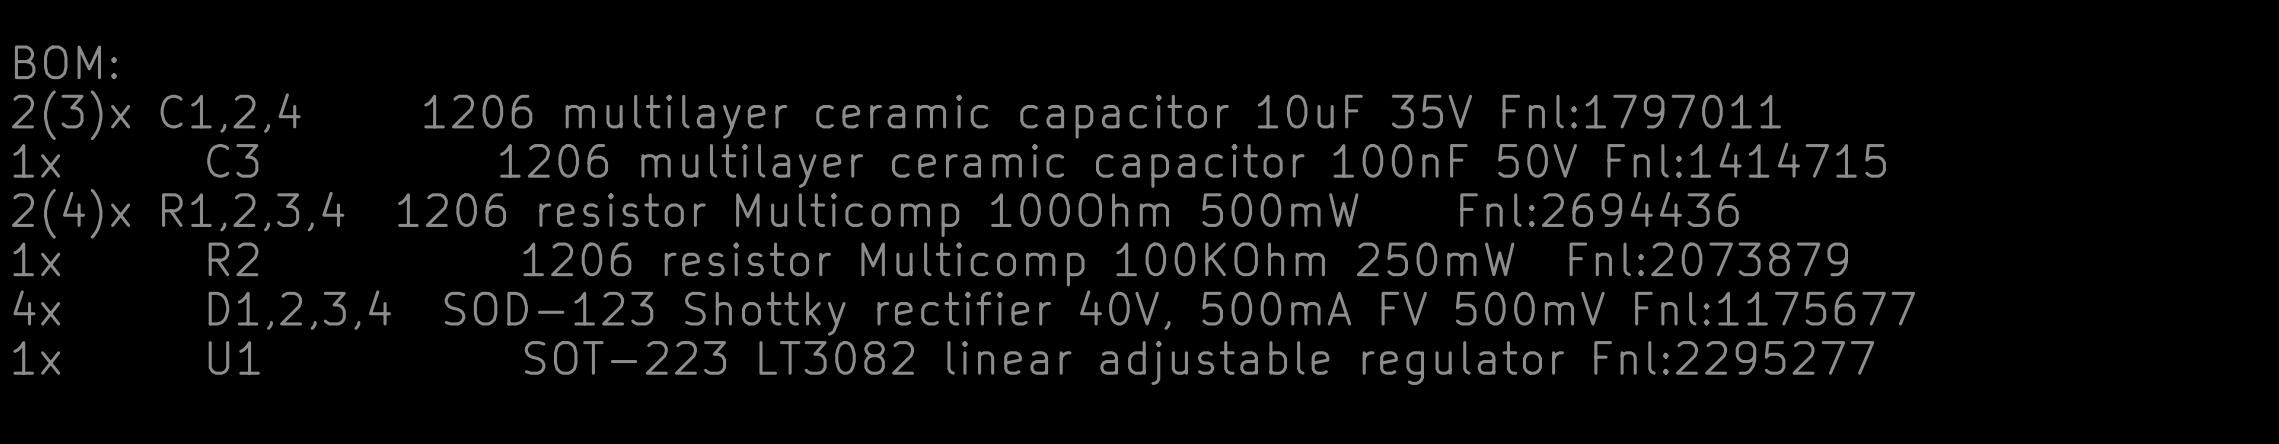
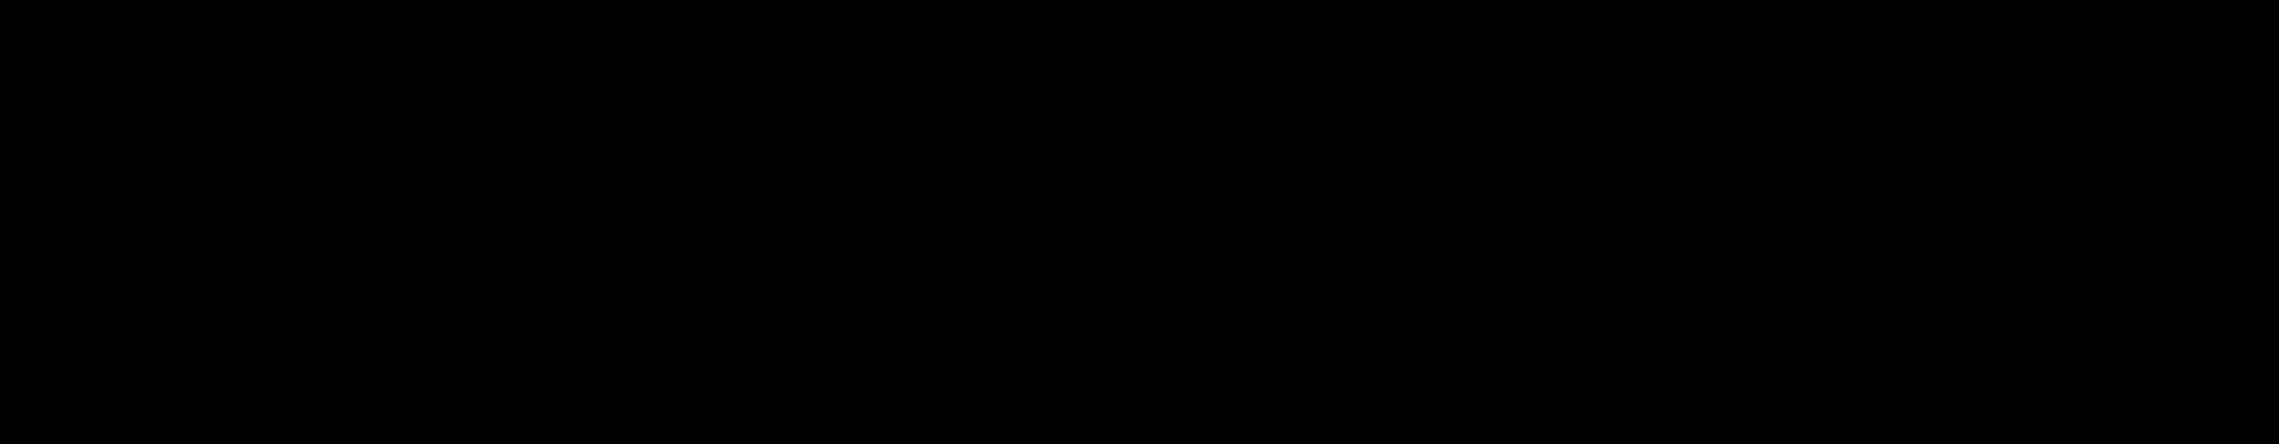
text: BOM: (65, 62) -> none
text: 2(3)x C1,2,4 1206 multilayer ceramic capacitor 10uF 35V Fnl:1797011 (896, 115) -> none
text: 1x C3 1206 multilayer ceramic capacitor 100nF 50V Fnl:1414715 (949, 165) -> none
text: 2(4)x R1,2,3,4 1206 resistor Multicomp 100Ohm 500mW Fnl:2694436 (875, 213) -> none
text: 1x R2 1206 resistor Multicomp 100KOhm 250mW Fnl:2073879 (930, 264) -> none
text: 4x D1,2,3,4 SOD-123 Shottky rectifier 40V, 500mA FV 500mV Fnl:1175677 (964, 313) -> none
text: 1x U1 SOT-223 LT3082 linear adjustable regulator Fnl:2295277 (943, 363) -> none

